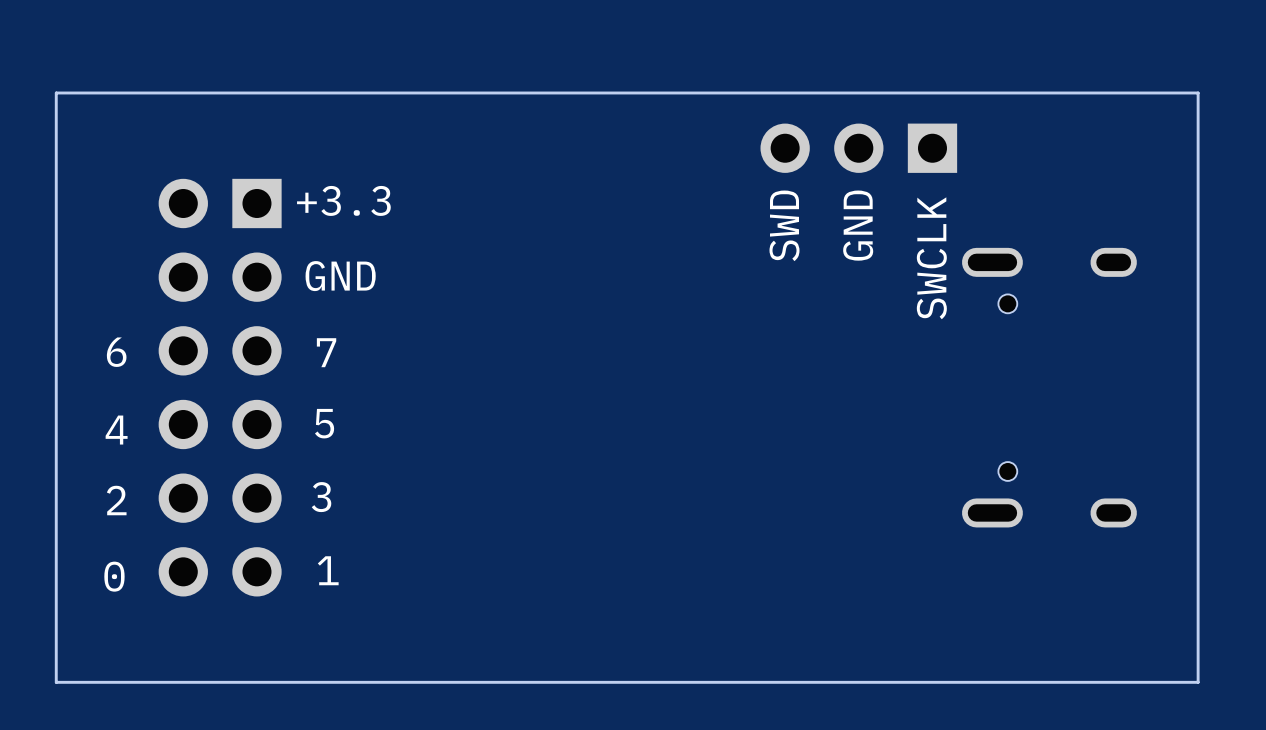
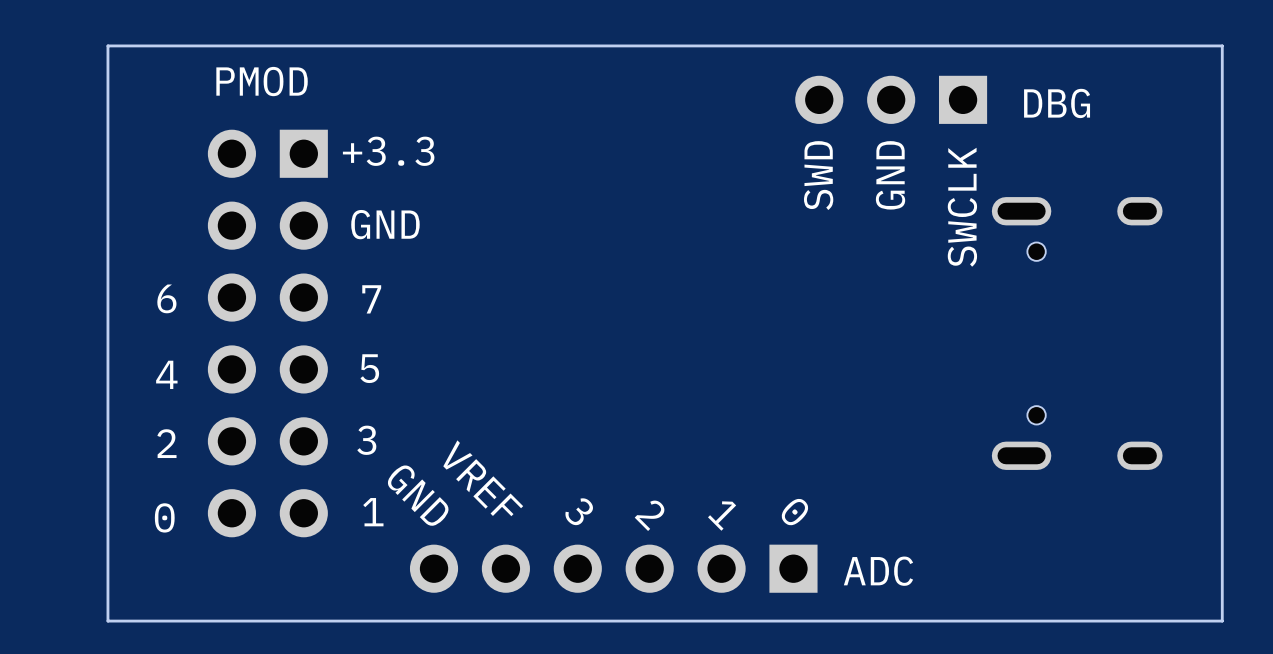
text: none -> PMOD (262, 81)
text: none -> DBG (1057, 103)
text: none -> VREF (483, 478)
text: none -> GND (418, 495)
text: none -> 3 (579, 511)
text: none -> 0 (794, 512)
text: none -> 2 (649, 515)
text: none -> 1 (722, 516)
part: none -> (613, 568)
text: none -> ADC (878, 571)

